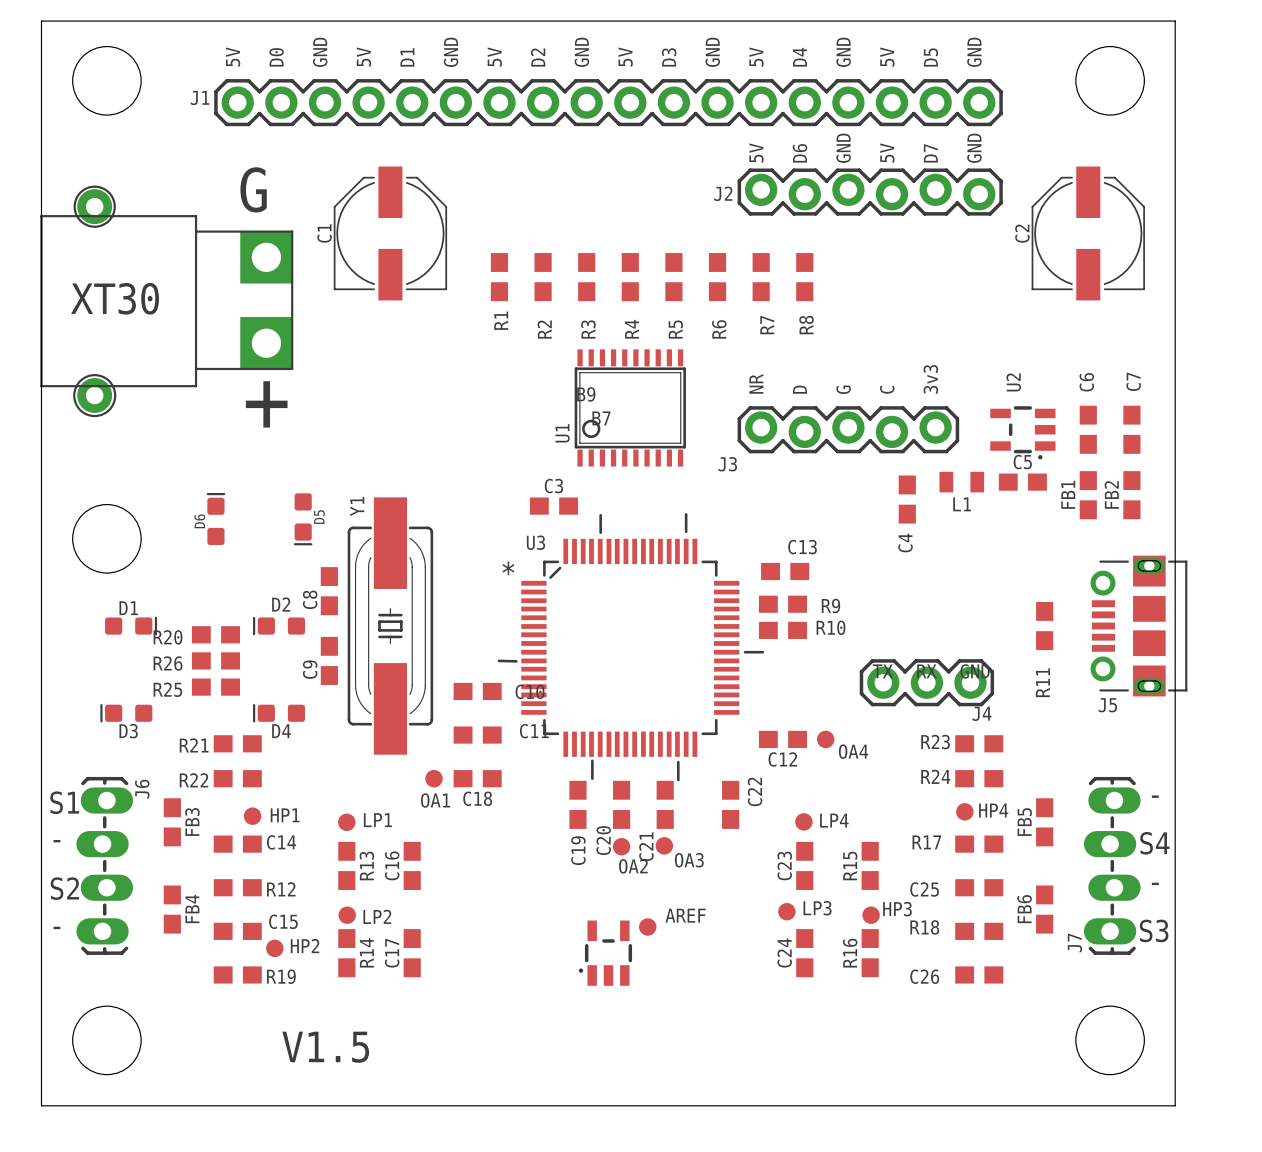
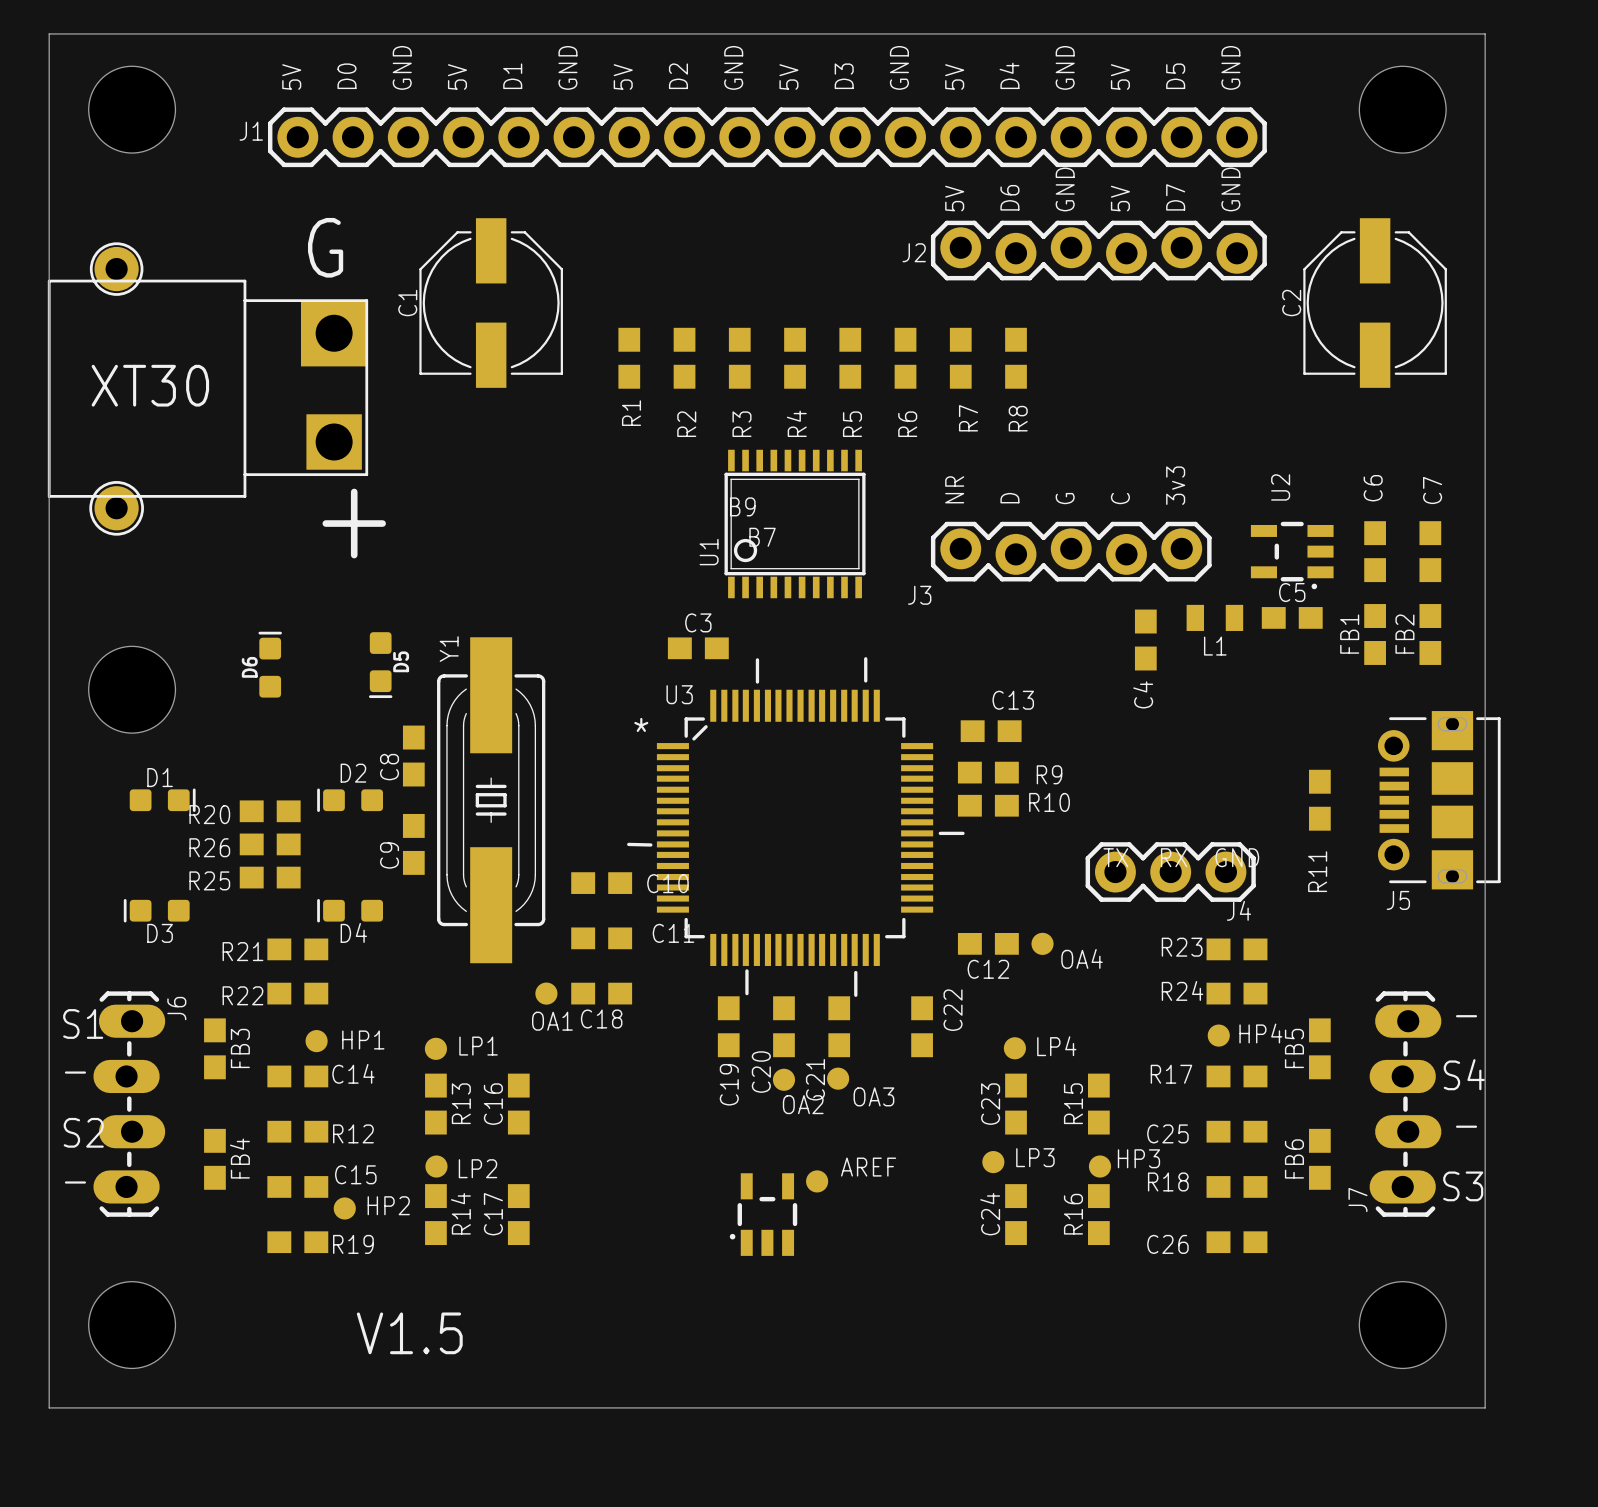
part footprint: [40, 185, 294, 418] -> [47, 242, 369, 536]

